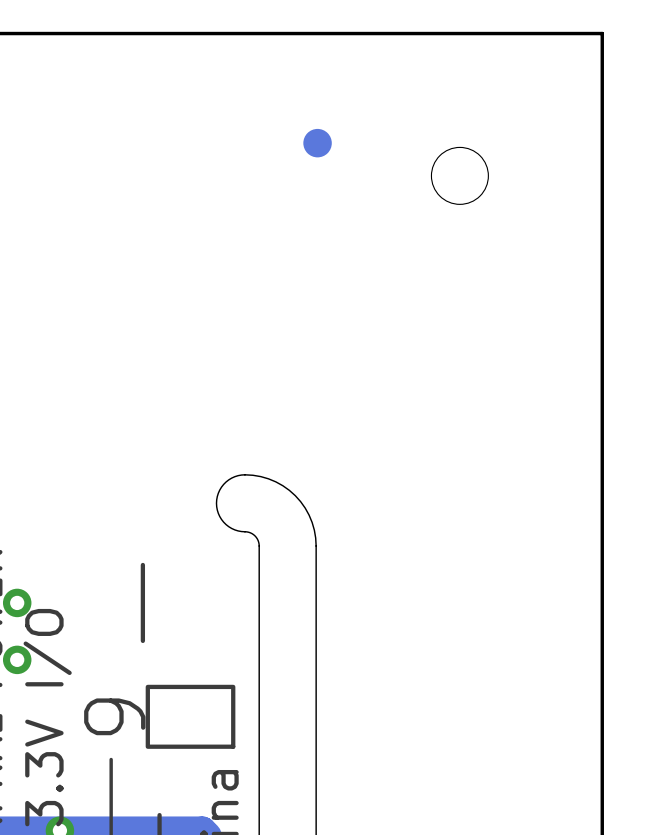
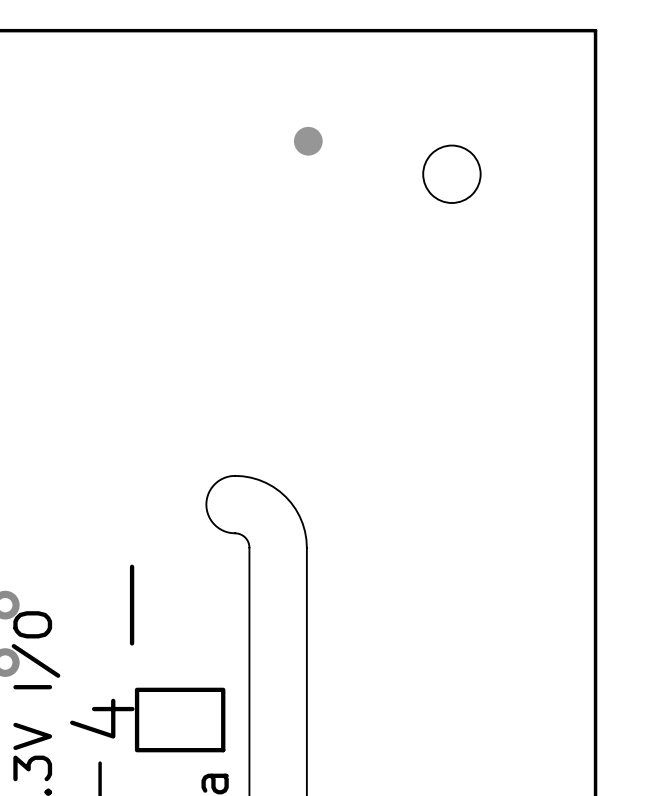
text: 9 (114, 716) -> 4 (102, 718)

